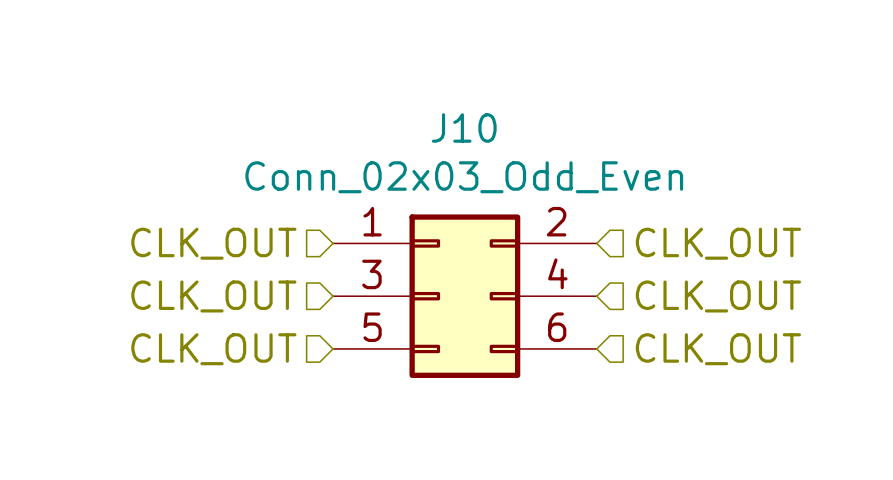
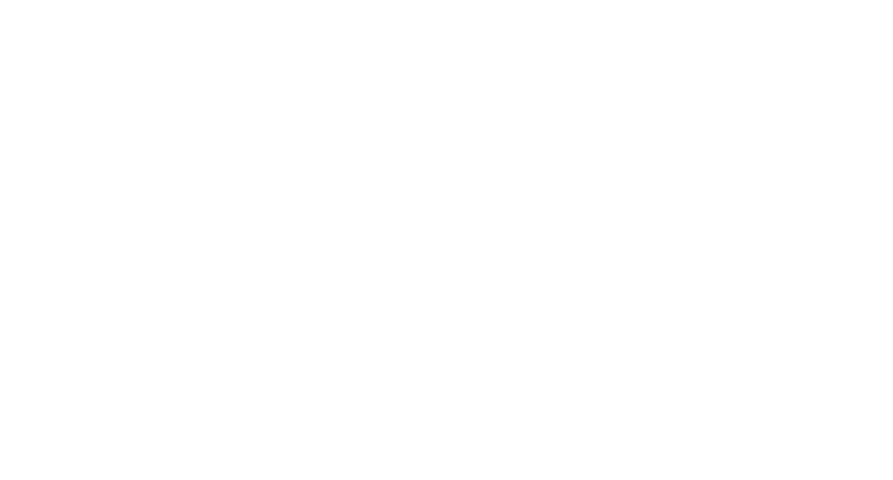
hierarchical label: CLK_OUT (213, 243) -> none
hierarchical label: CLK_OUT (718, 243) -> none
hierarchical label: CLK_OUT (213, 296) -> none
J10: Conn_02x03_Odd_Even (464, 296) -> none
hierarchical label: CLK_OUT (718, 296) -> none
hierarchical label: CLK_OUT (213, 349) -> none
hierarchical label: CLK_OUT (718, 349) -> none

